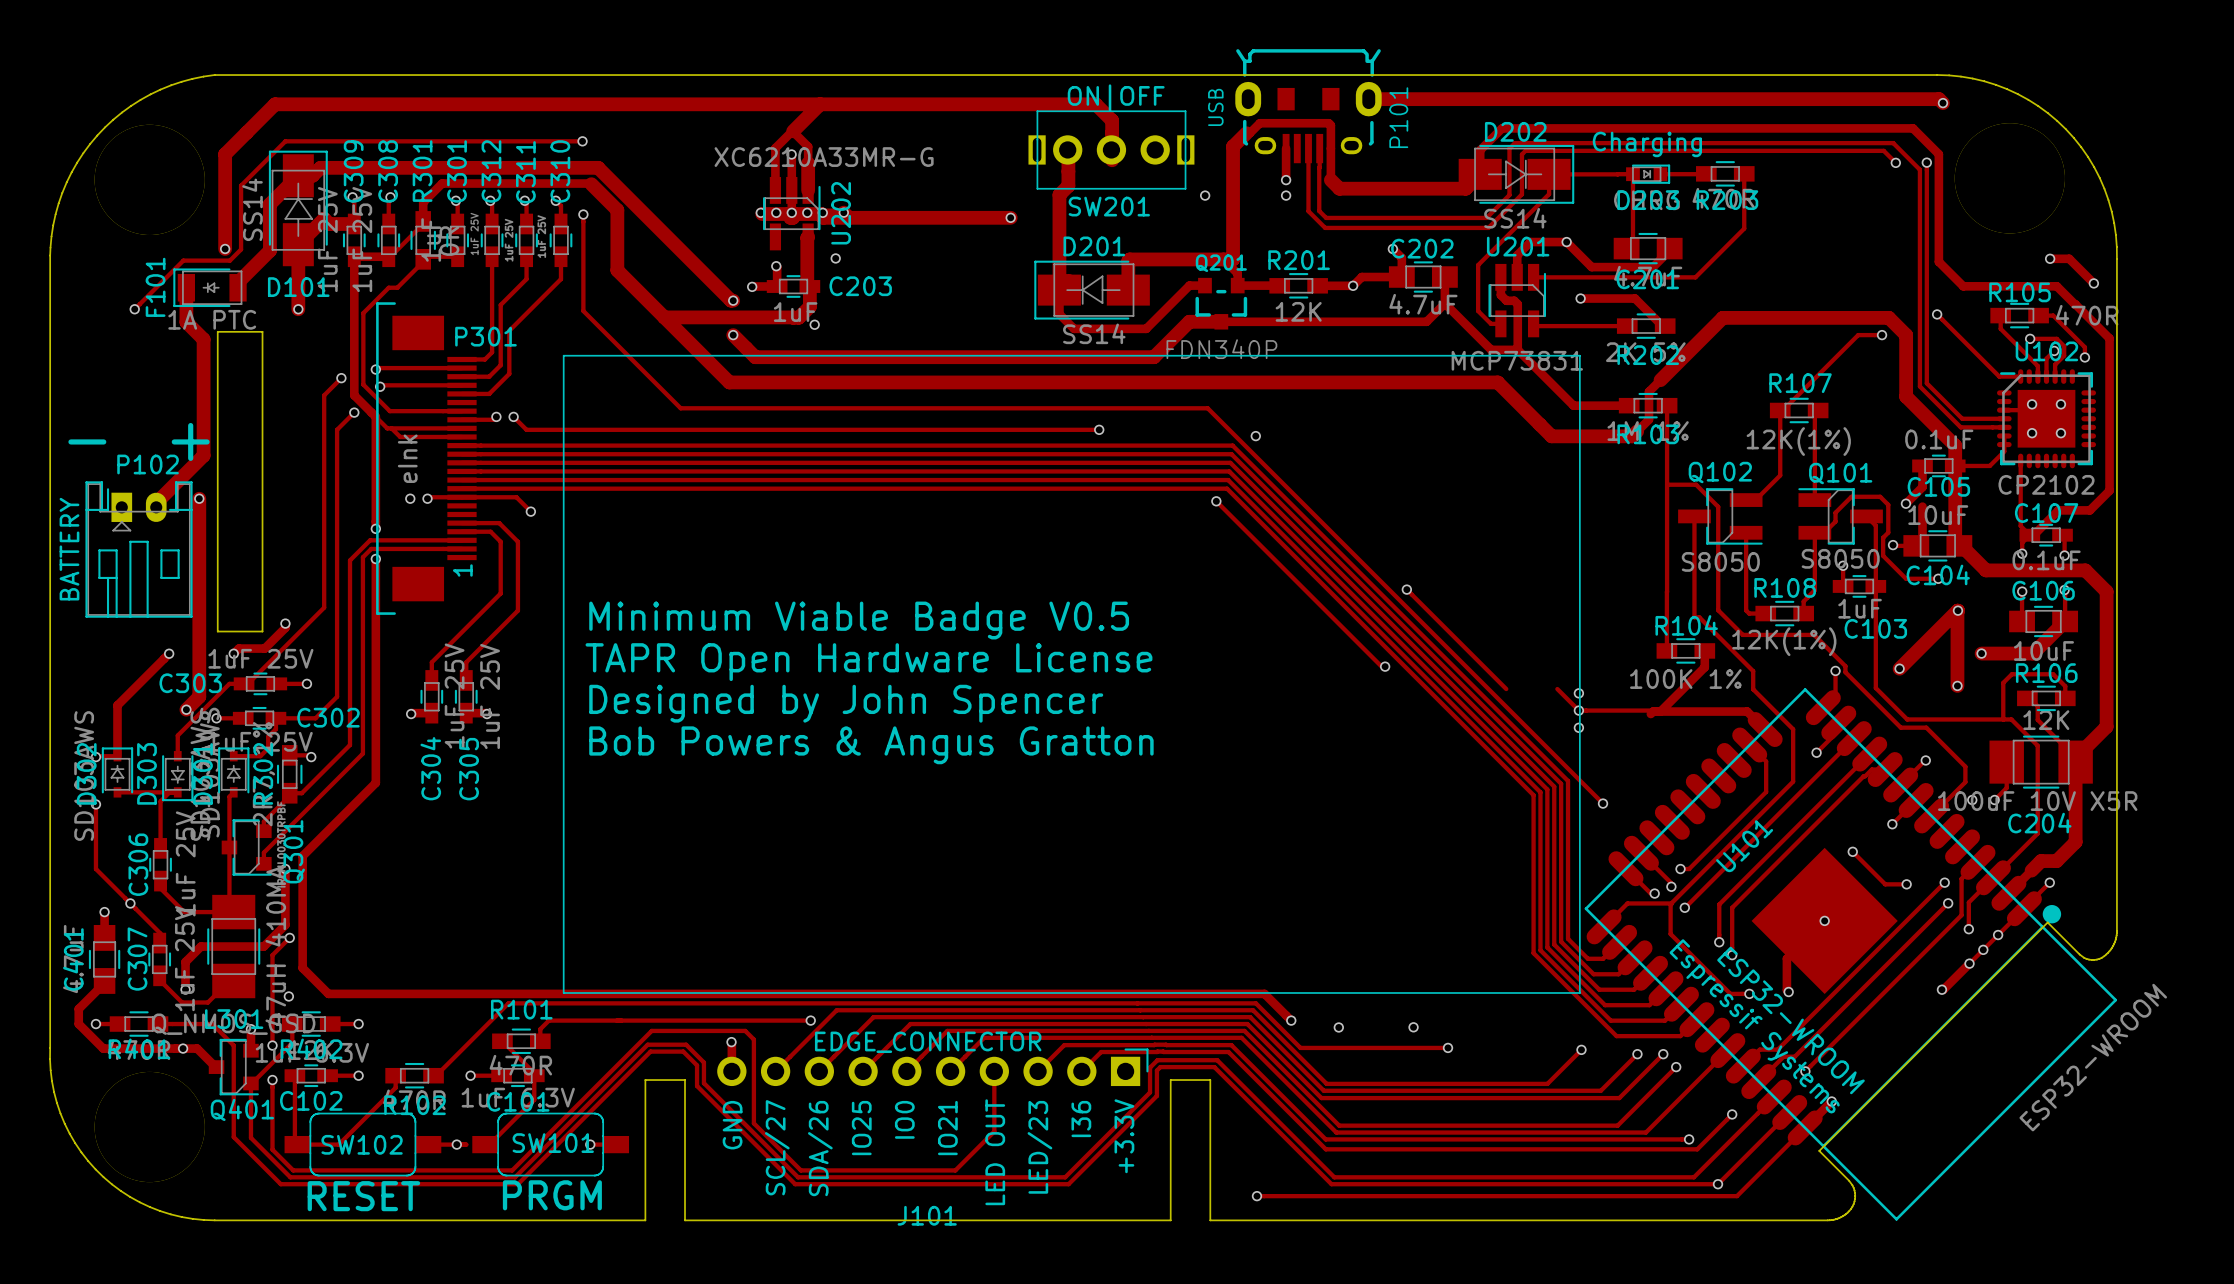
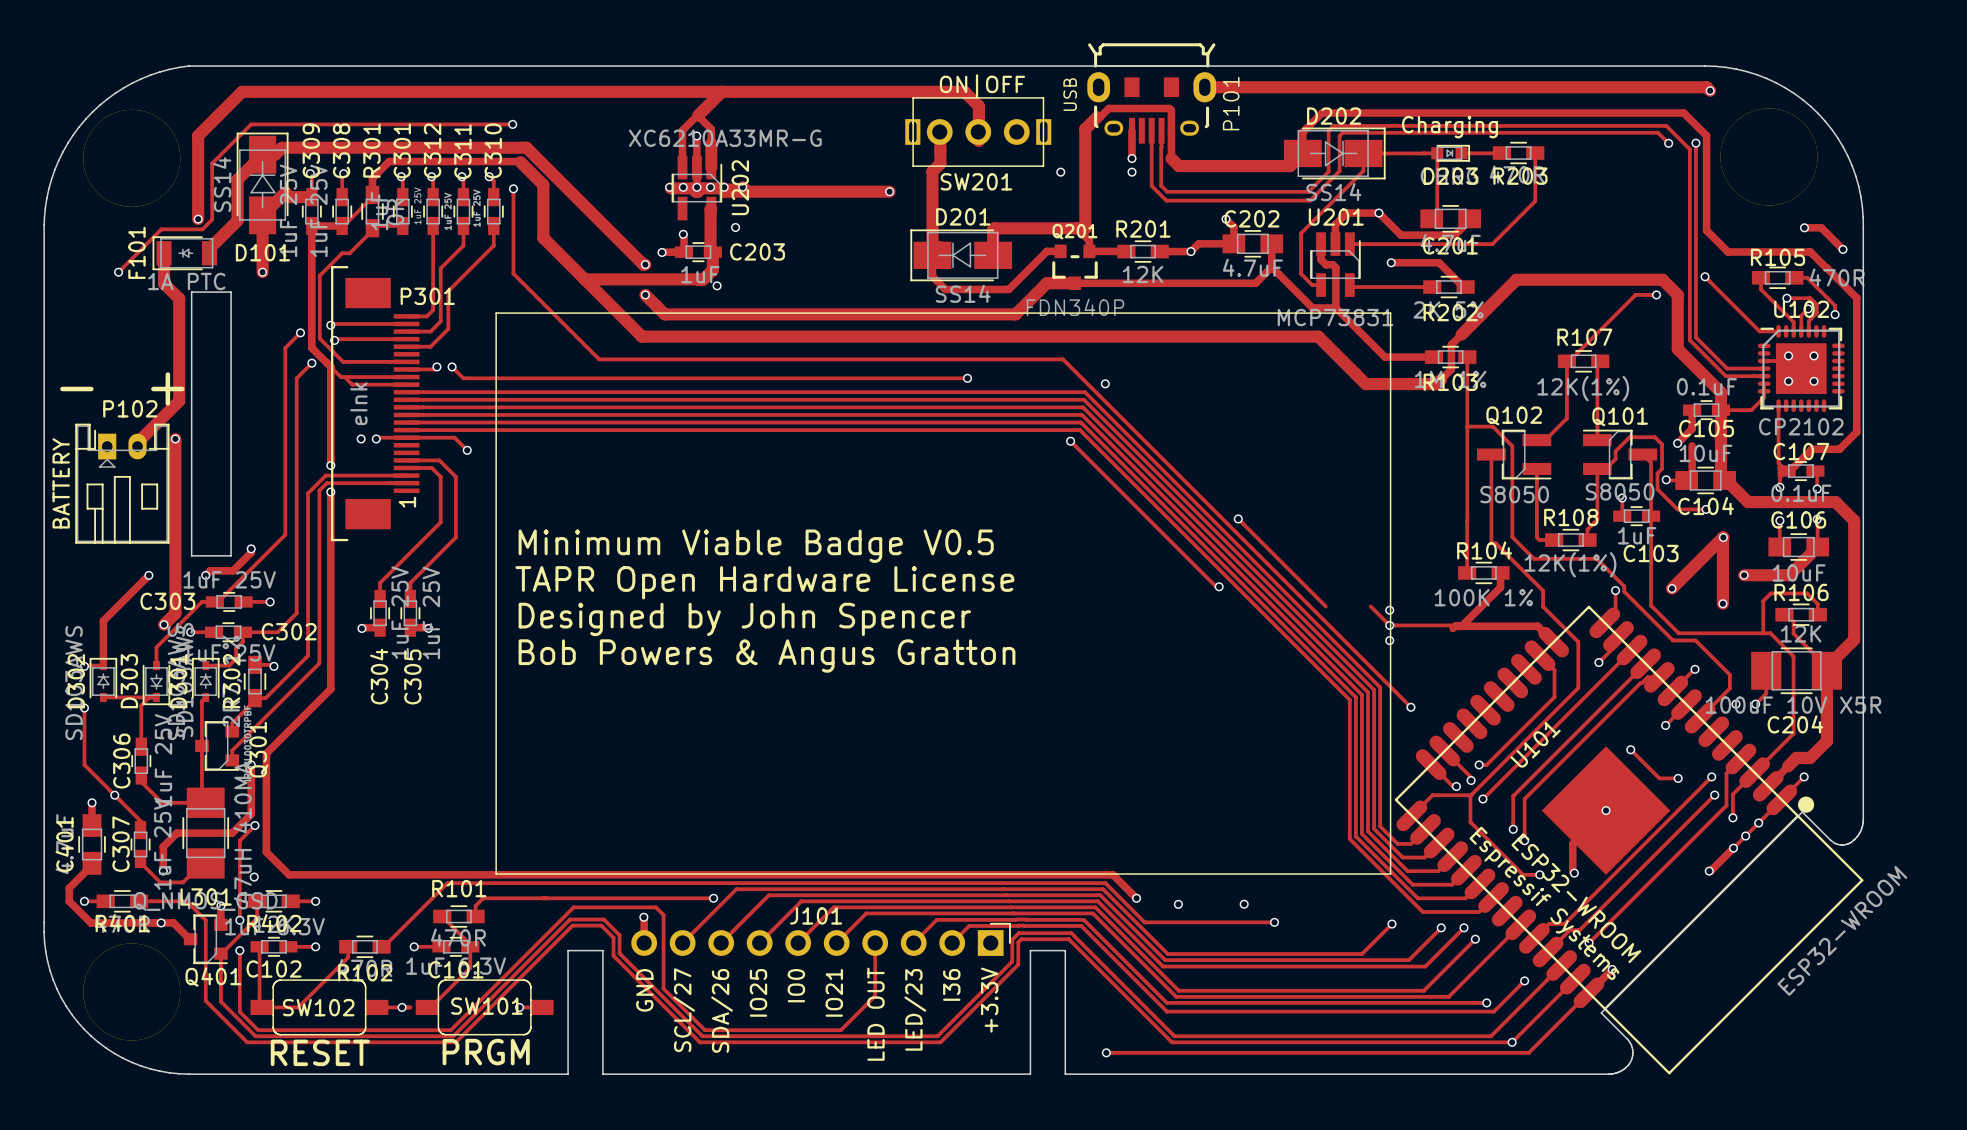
J101 value: EDGE_CONNECTOR (928, 1042) -> none
J101 name position: J101 (927, 1215) -> J101 (816, 915)

